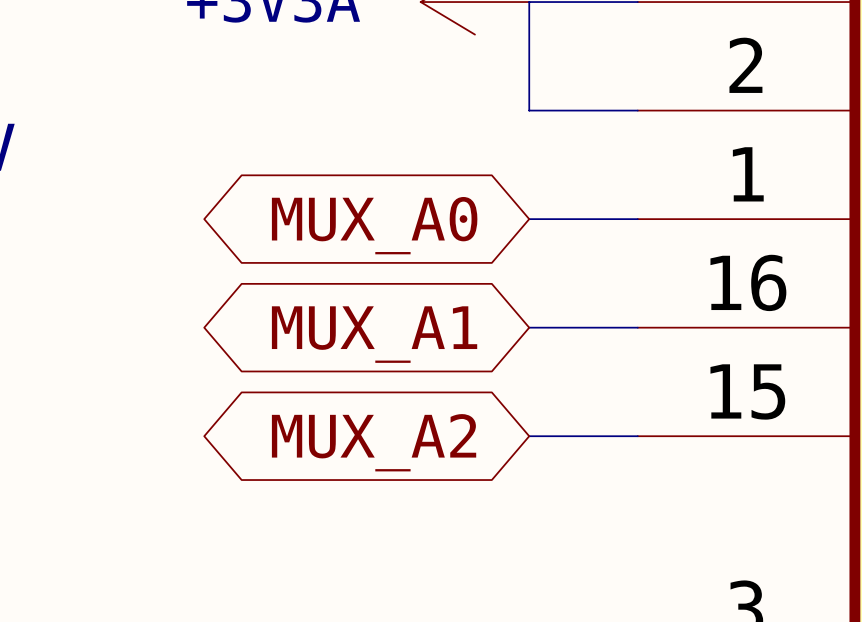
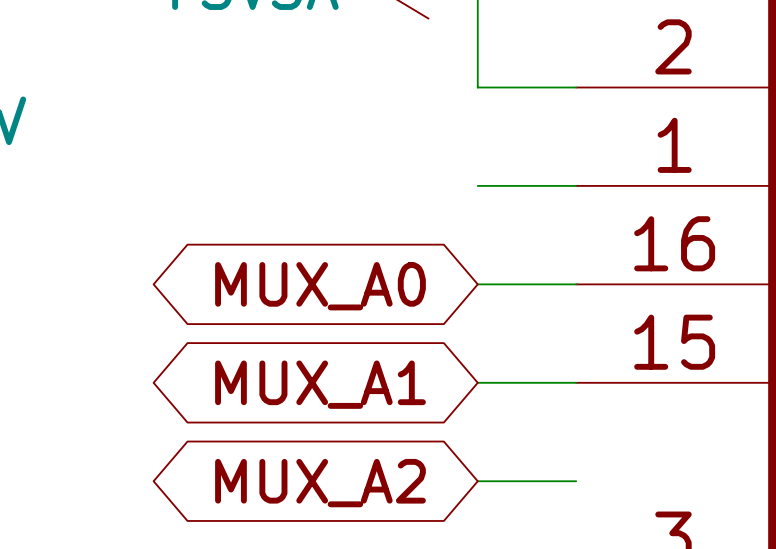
global label: MUX_A0 (374, 225) -> none
global label: MUX_A1 (374, 334) -> MUX_A0 (320, 286)
global label: MUX_A2 (374, 442) -> MUX_A1 (320, 384)
wire: none -> (477, 481) (576, 481)
global label: none -> MUX_A2 (320, 483)

